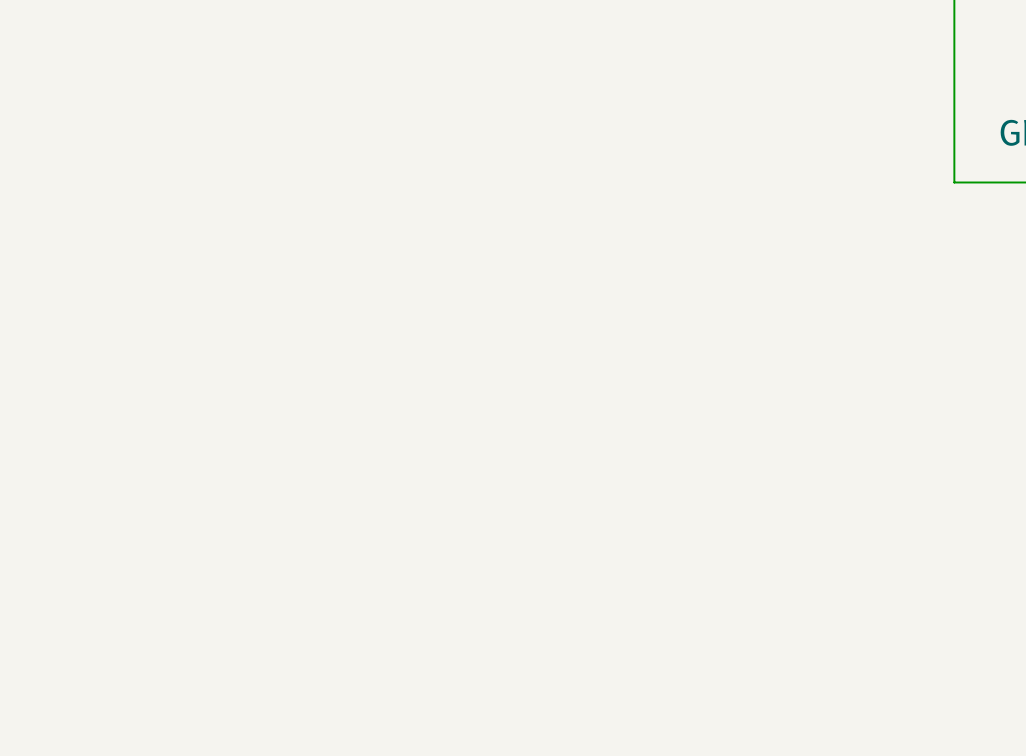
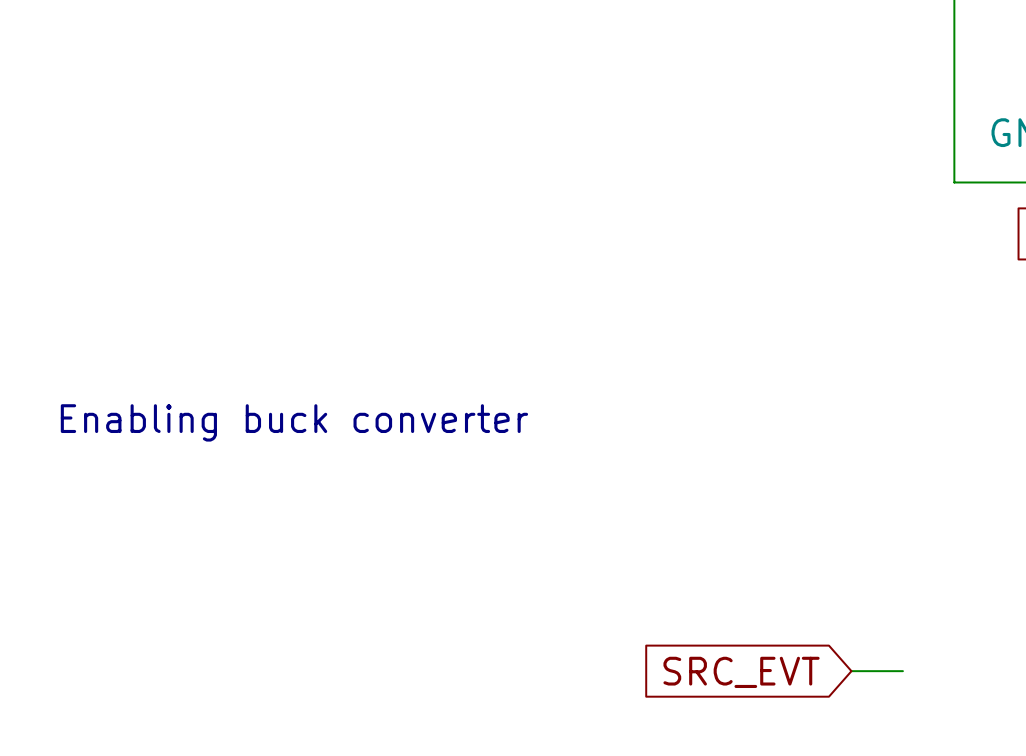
text: none -> Enabling buck converter (294, 422)
wire: none -> (851, 671) (902, 671)
global label: none -> SRC_EVT (741, 672)

